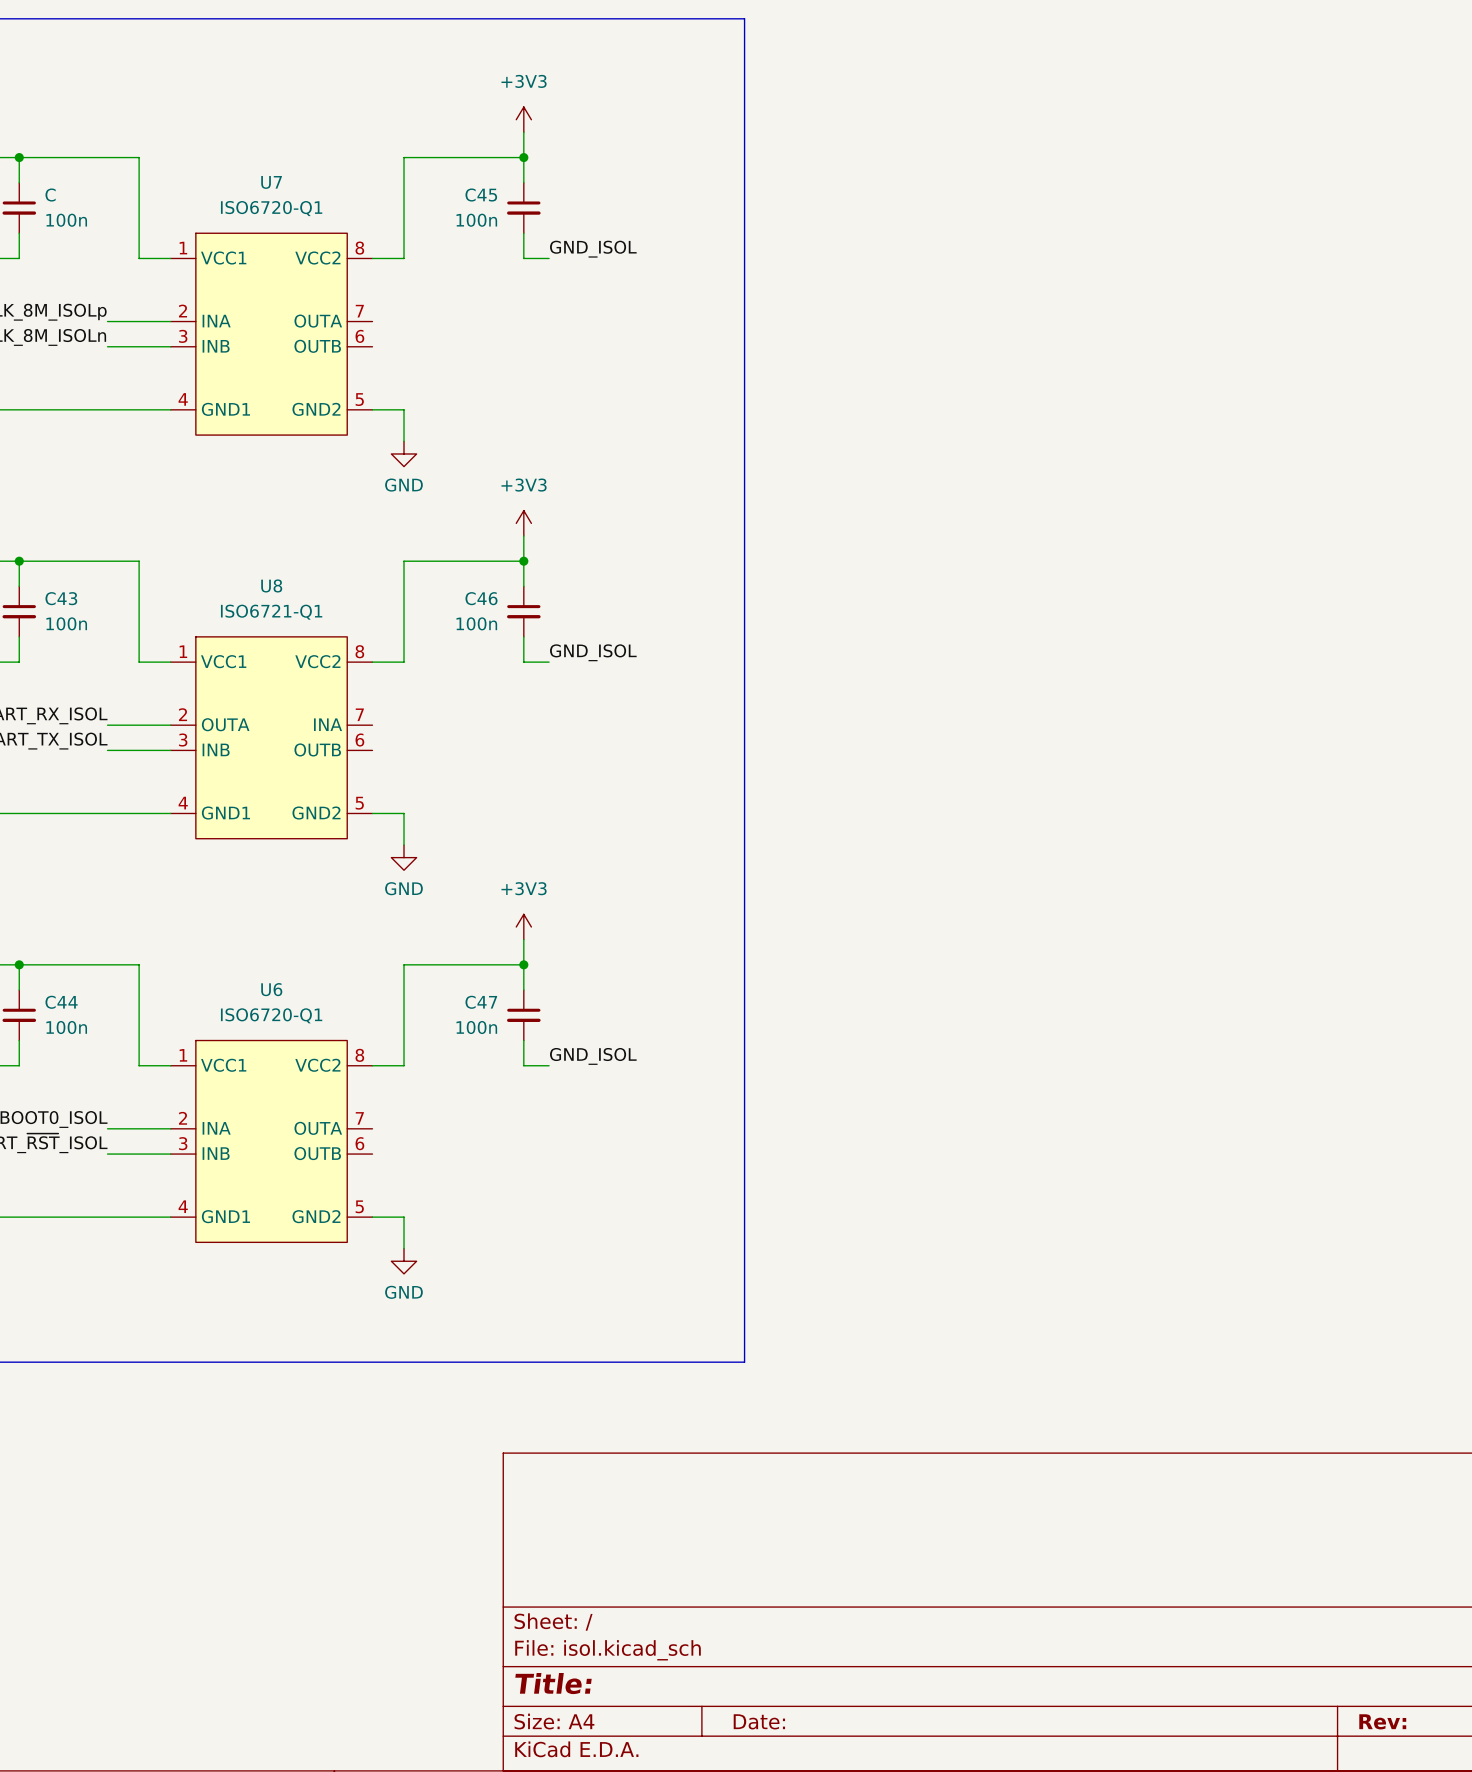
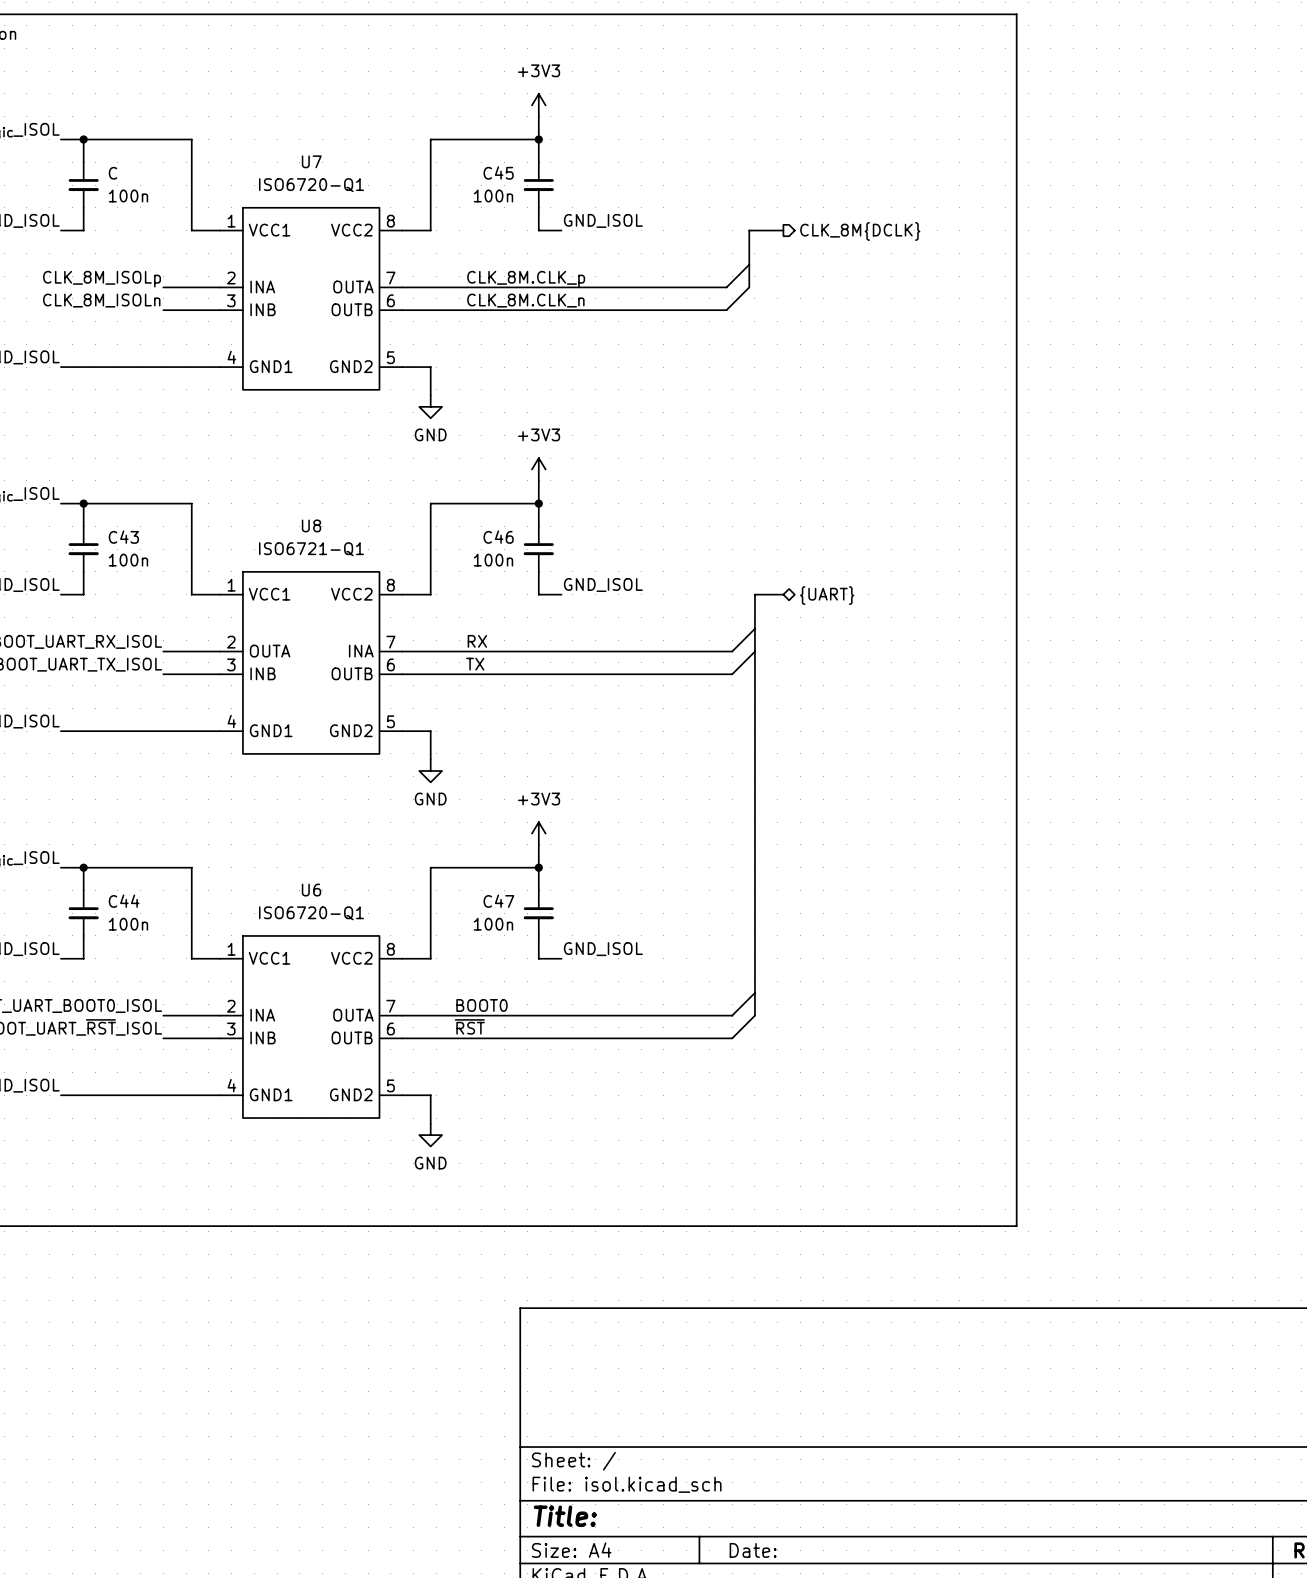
line: (744, 18) (744, 1362) -> (737, 14) (1016, 14) (1016, 1226) (737, 1226)
bus: none -> (783, 230) (749, 230) (749, 287)
hierarchical label: none -> CLK_8M{DCLK} (860, 231)
wire: none -> (749, 264) (726, 287) (402, 287)
label: none -> CLK_8M.CLK_p (526, 279)
wire: none -> (749, 287) (726, 310) (402, 310)
label: none -> CLK_8M.CLK_n (525, 300)
bus: none -> (783, 594) (754, 594) (754, 1015)
hierarchical label: none -> {UART} (827, 595)
wire: none -> (754, 628) (732, 651) (402, 651)
label: none -> RX (477, 641)
wire: none -> (754, 651) (732, 674) (402, 674)
label: none -> TX (475, 664)
wire: none -> (754, 992) (732, 1015) (402, 1015)
label: none -> BOOT0 (481, 1005)
wire: none -> (754, 1015) (732, 1038) (402, 1038)
label: none -> ~{RST} (469, 1026)

